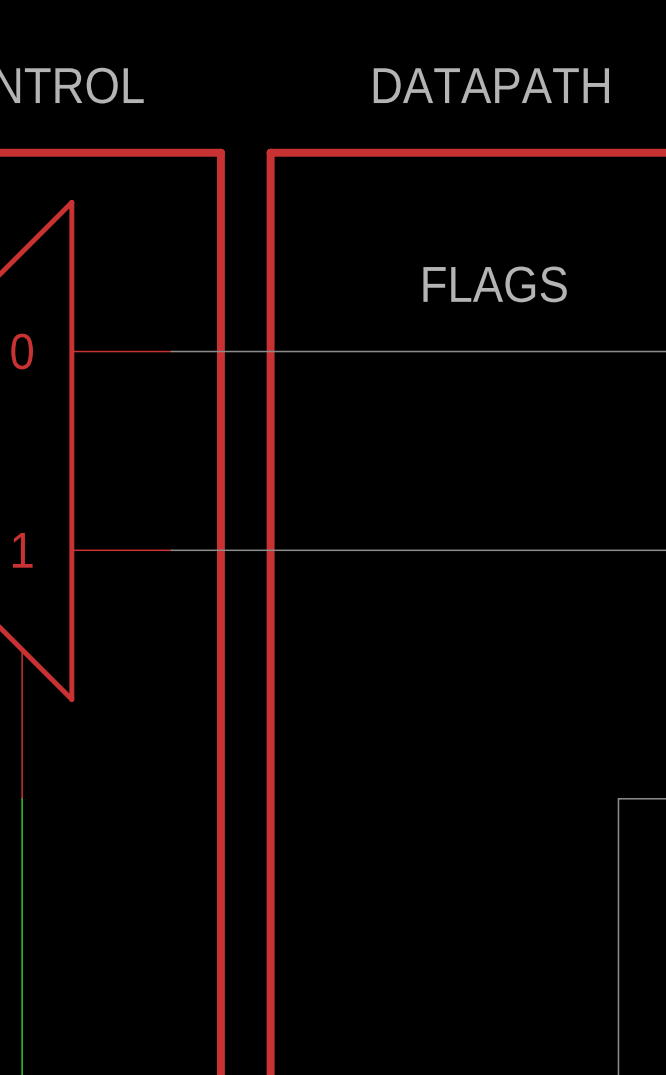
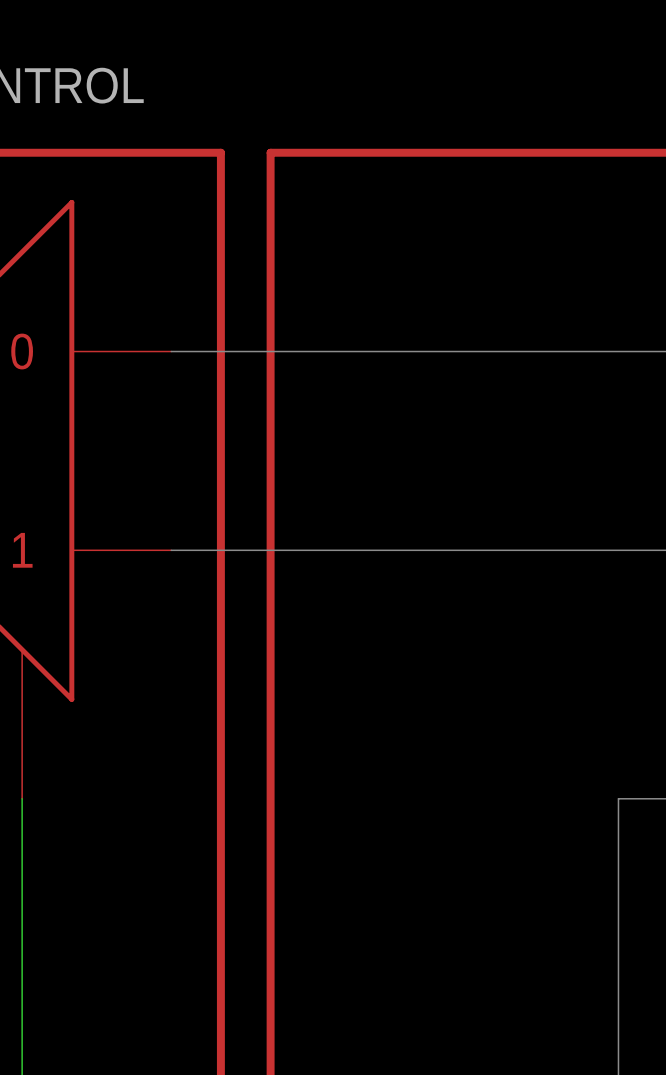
text: DATAPATH (491, 85) -> none
label: FLAGS (495, 284) -> none

